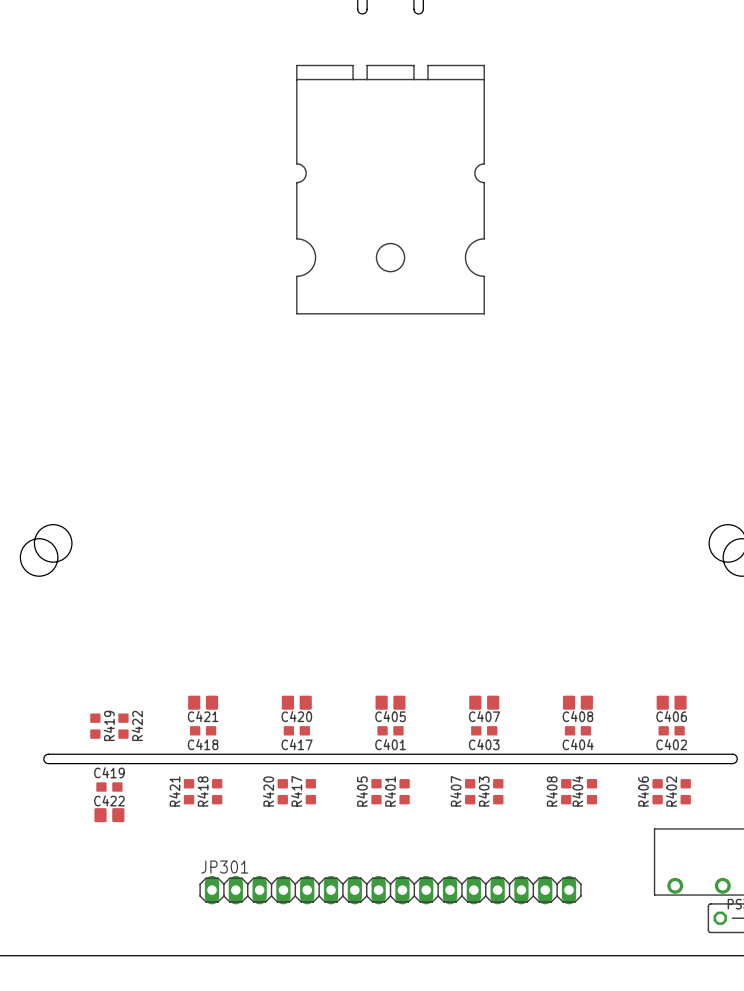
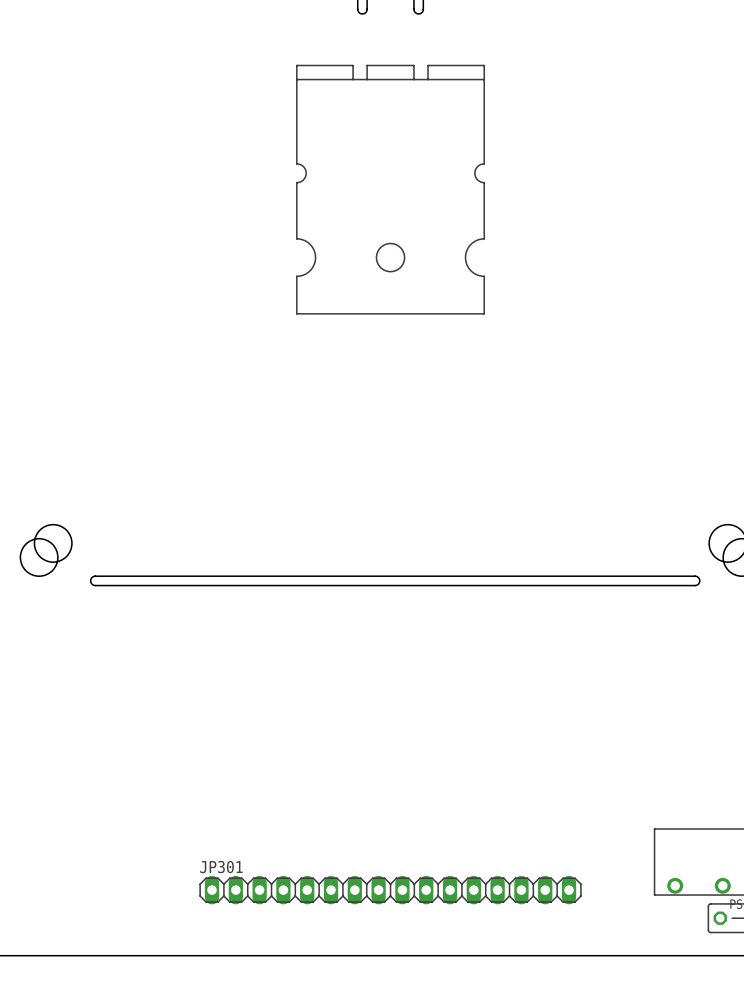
board edge: none -> (95, 576) (695, 576) (699, 580) (695, 585) (95, 585) (90, 580) (95, 576)
C421: (203, 702) -> none
C420: (296, 702) -> none
C405: (390, 702) -> none
C407: (484, 702) -> none
C408: (577, 702) -> none
C406: (671, 702) -> none
R419: (95, 726) -> none
R422: (123, 726) -> none
C418: (203, 730) -> none
C417: (296, 730) -> none
C401: (390, 730) -> none
C403: (484, 730) -> none
C404: (577, 730) -> none
C402: (671, 730) -> none
board edge: (48, 754) (732, 754) (737, 758) (732, 763) (48, 763) (43, 758) (48, 754) -> none
C419: (109, 787) -> none
R421: (189, 791) -> none
R418: (217, 791) -> none
R420: (282, 791) -> none
R417: (310, 791) -> none
R405: (376, 791) -> none
R401: (404, 791) -> none
R407: (470, 791) -> none
R403: (498, 791) -> none
R408: (566, 791) -> none
R404: (592, 791) -> none
R406: (657, 791) -> none
R402: (685, 791) -> none
C422: (109, 815) -> none

